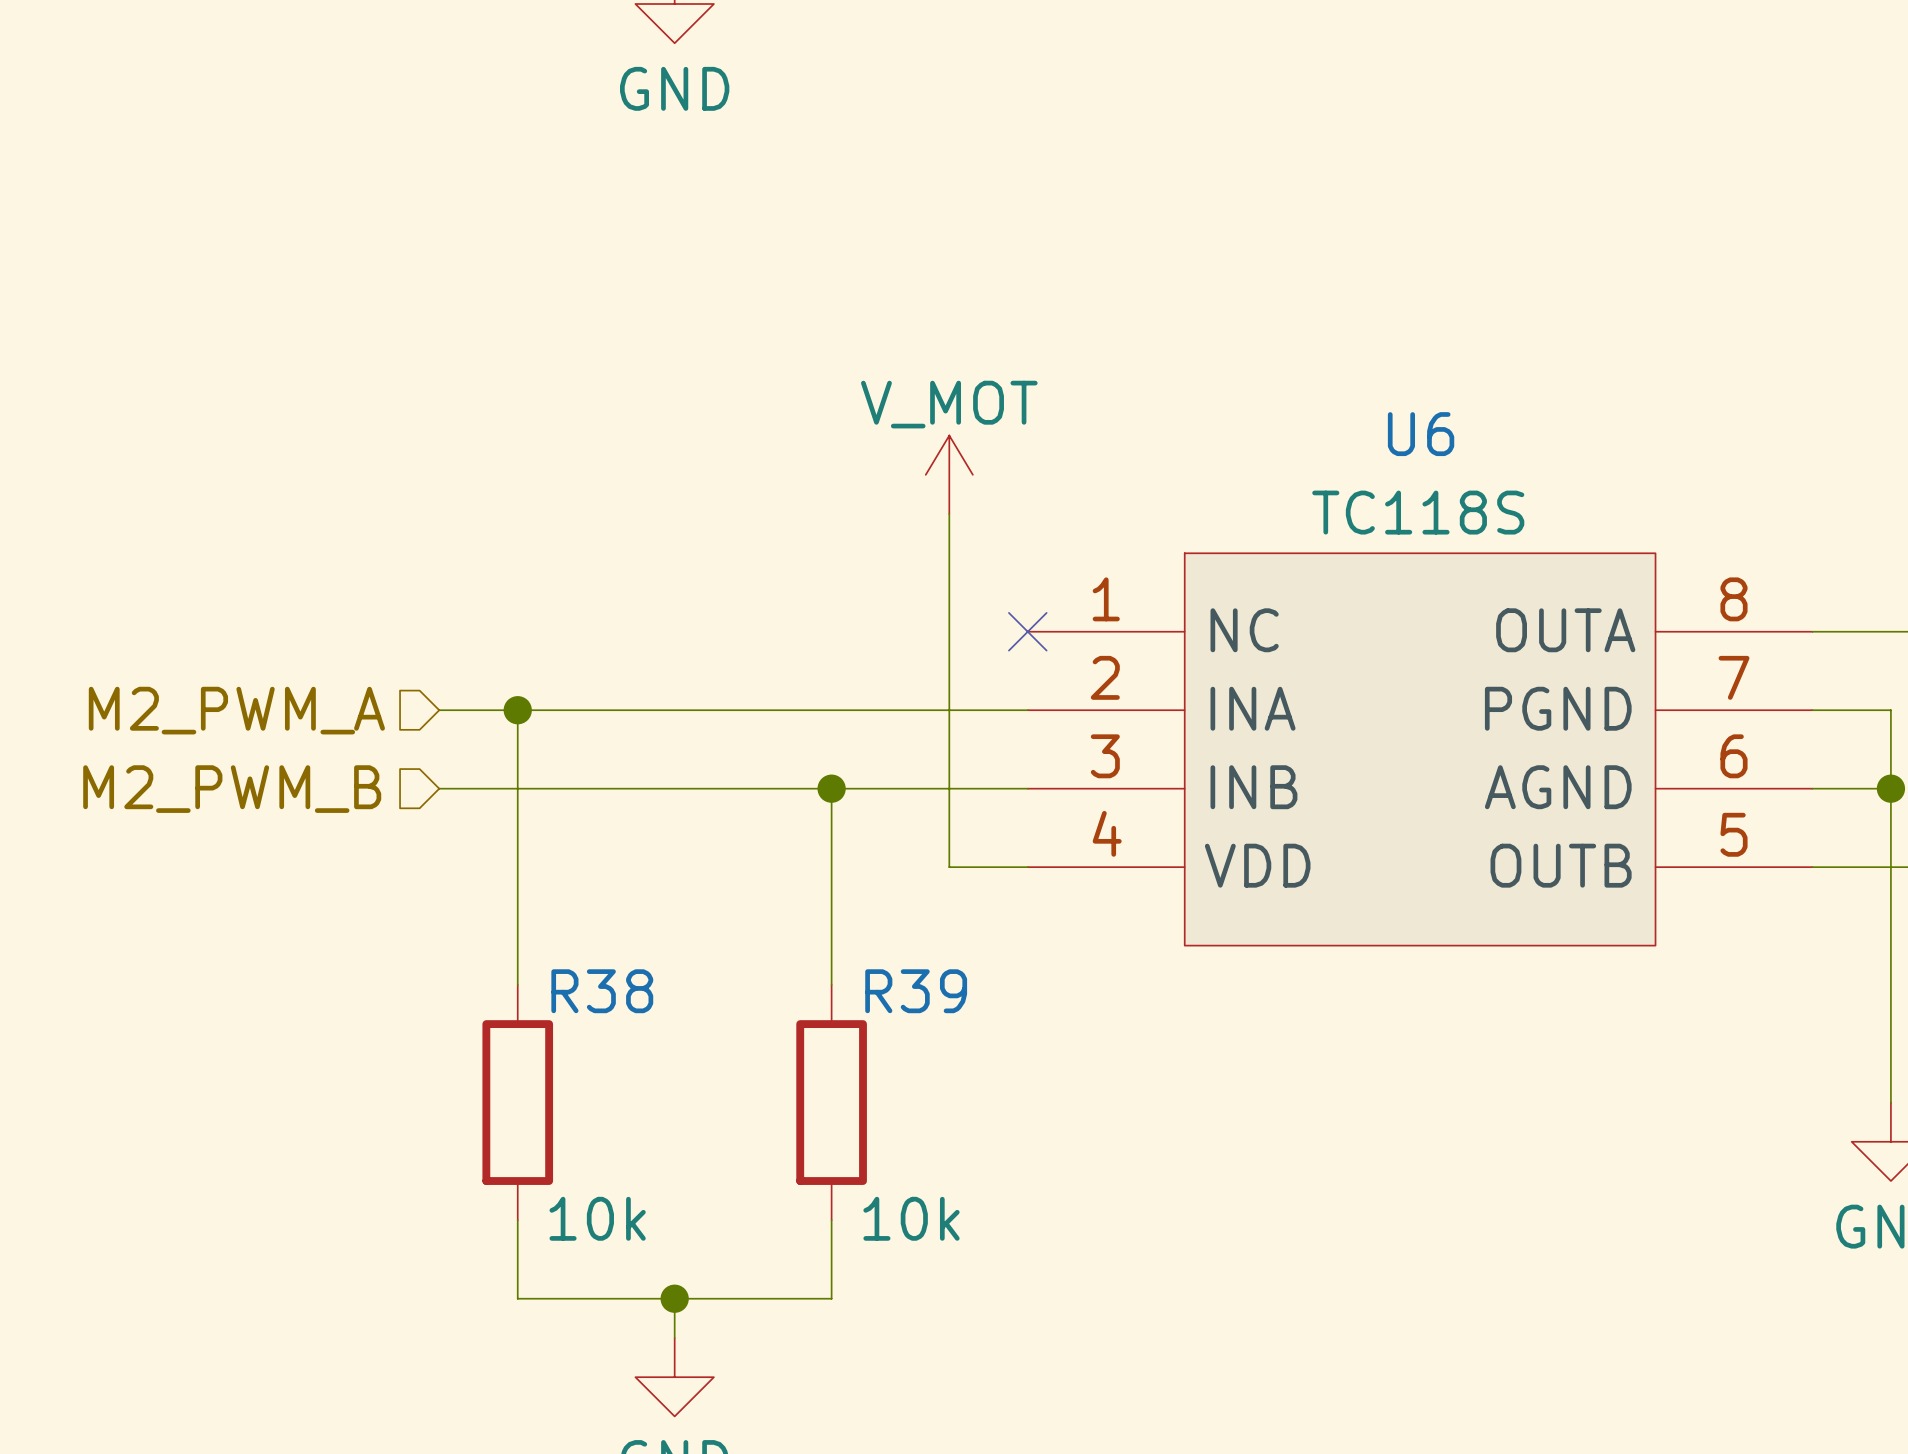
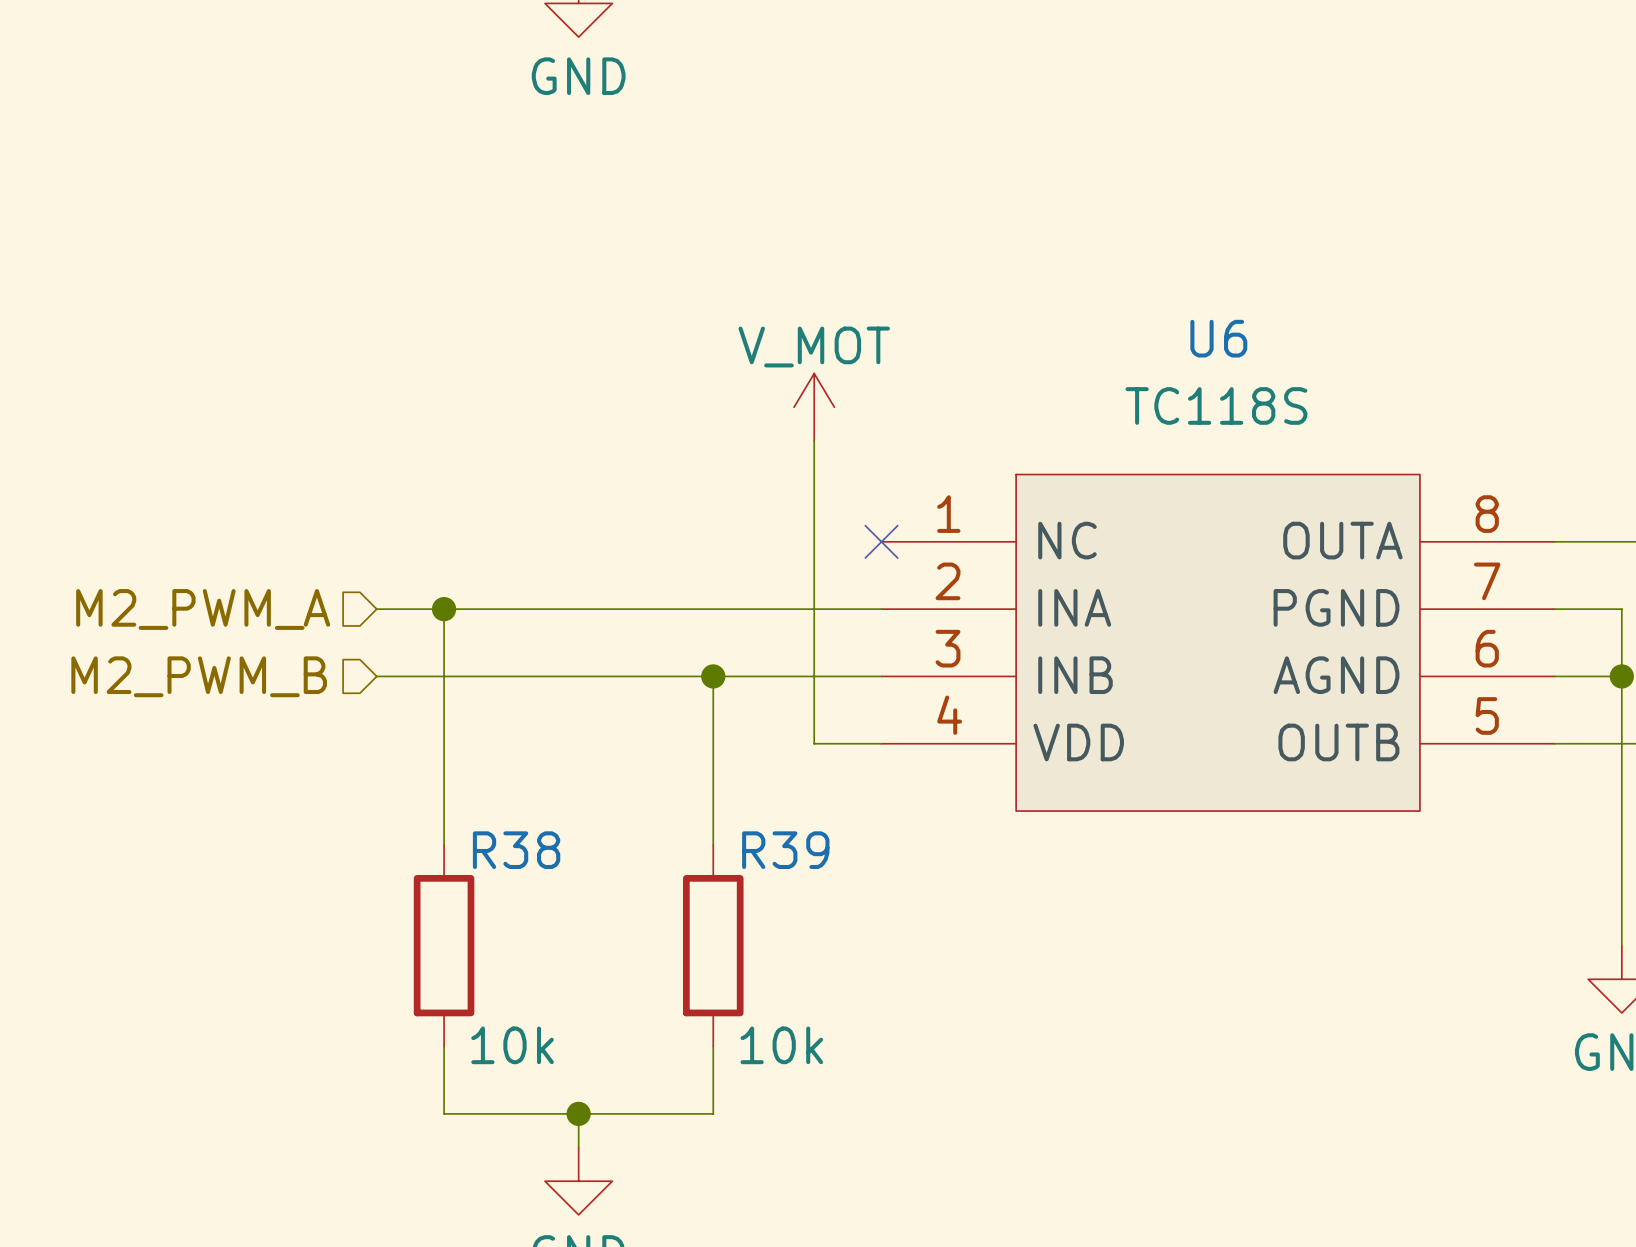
U6 name position: U6 (1421, 434) -> U6 (1218, 338)
U6 value position: TC118S (1418, 512) -> TC118S (1216, 405)

